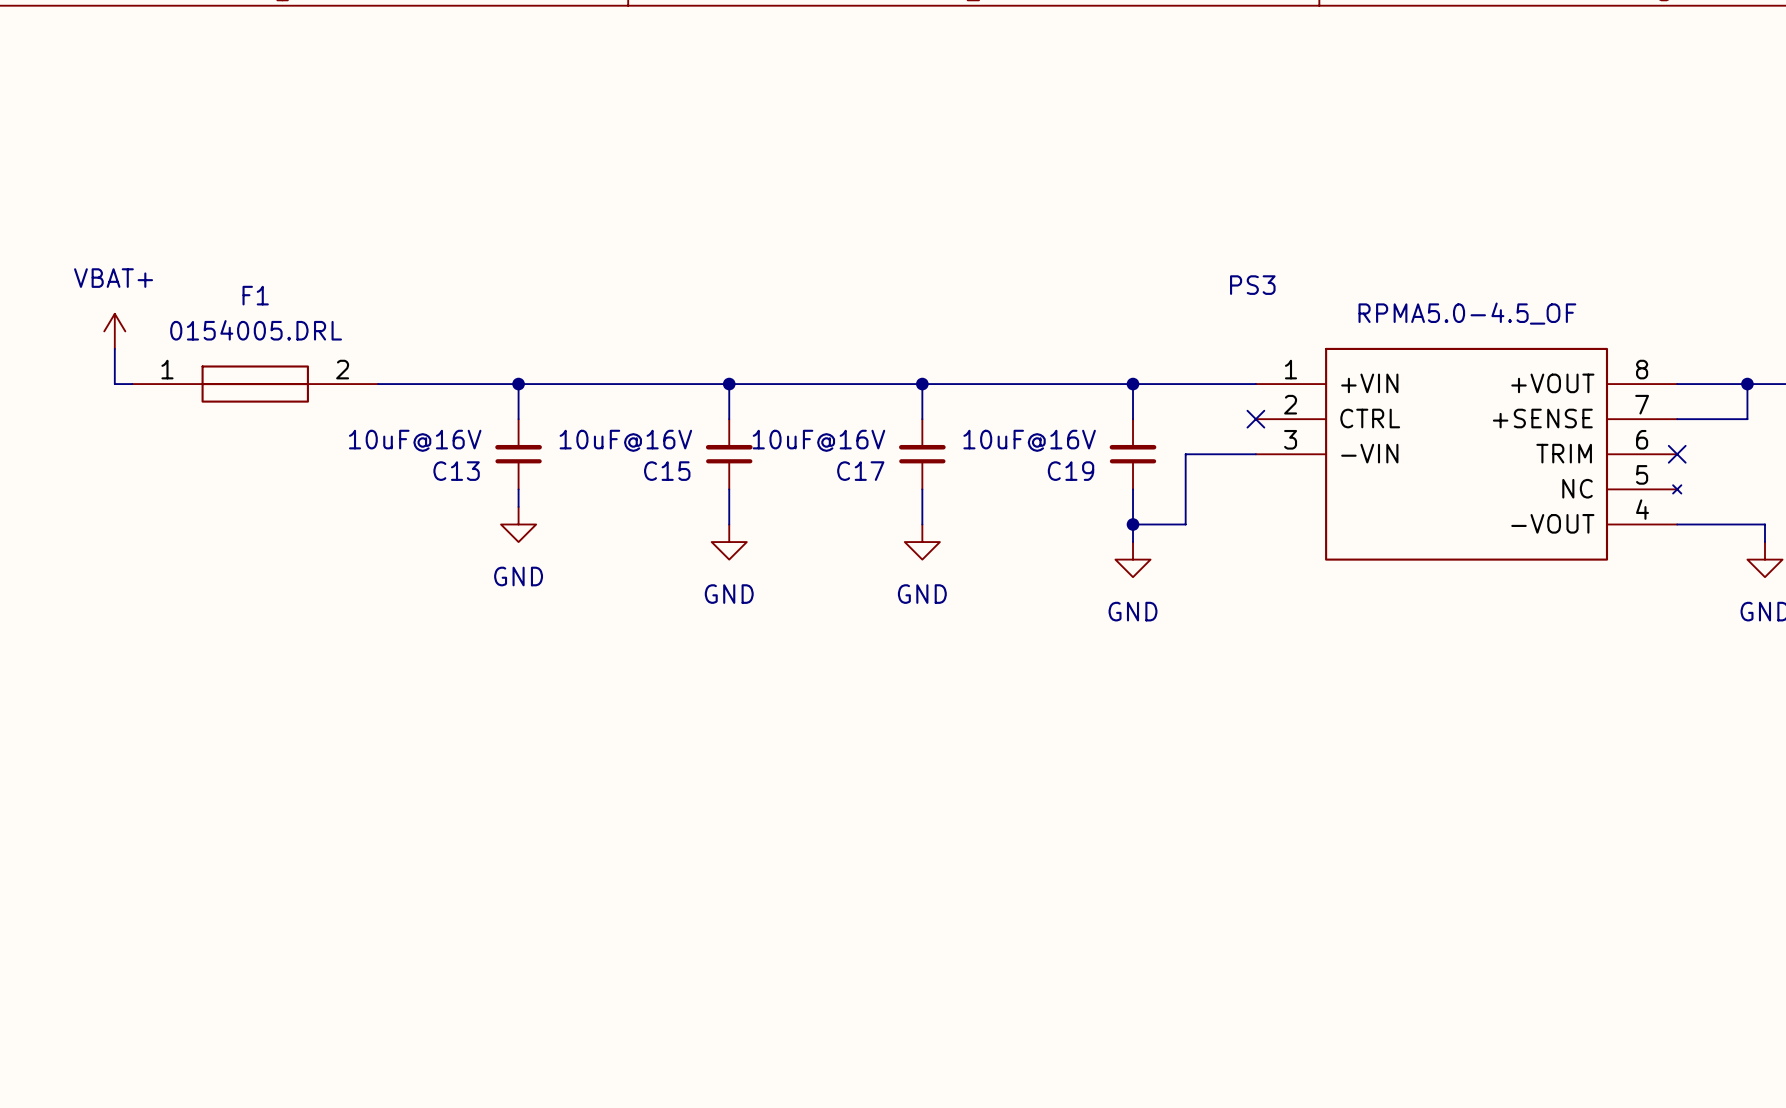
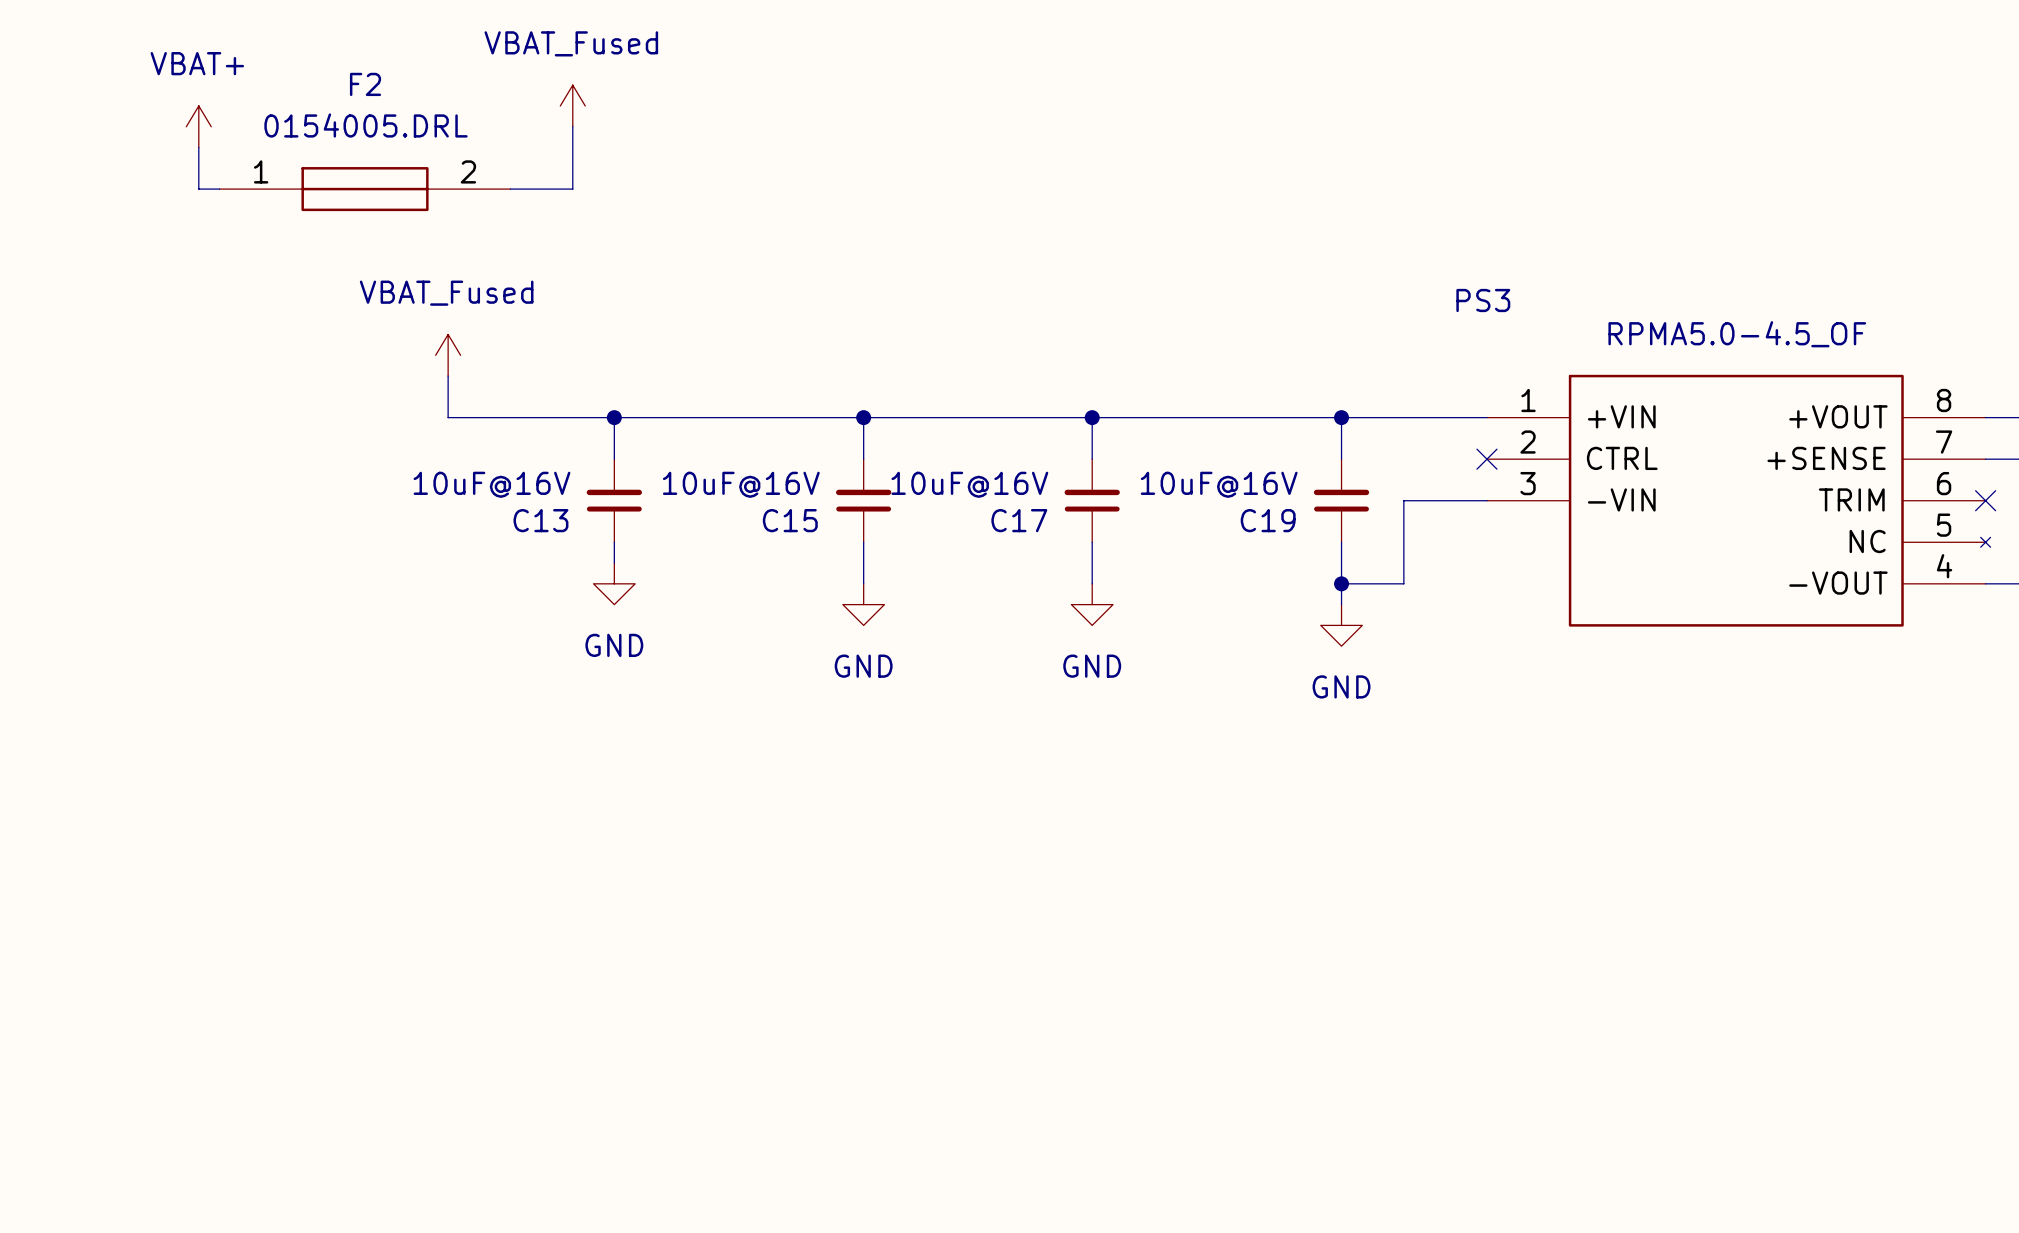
power symbol: none -> VBAT_Fused (572, 105)
wire: none -> (572, 126) (572, 189) (510, 189)
F2: none -> 0154005.DRL (365, 189)
power symbol position: VBAT+ (114, 331) -> VBAT+ (198, 126)
power symbol: none -> VBAT_Fused (448, 355)
wire: (114, 348) (114, 384) (132, 384) -> (198, 147) (198, 189) (219, 189)
wire: none -> (448, 376) (448, 417)
F1: 0154005.DRL (255, 384) -> none

